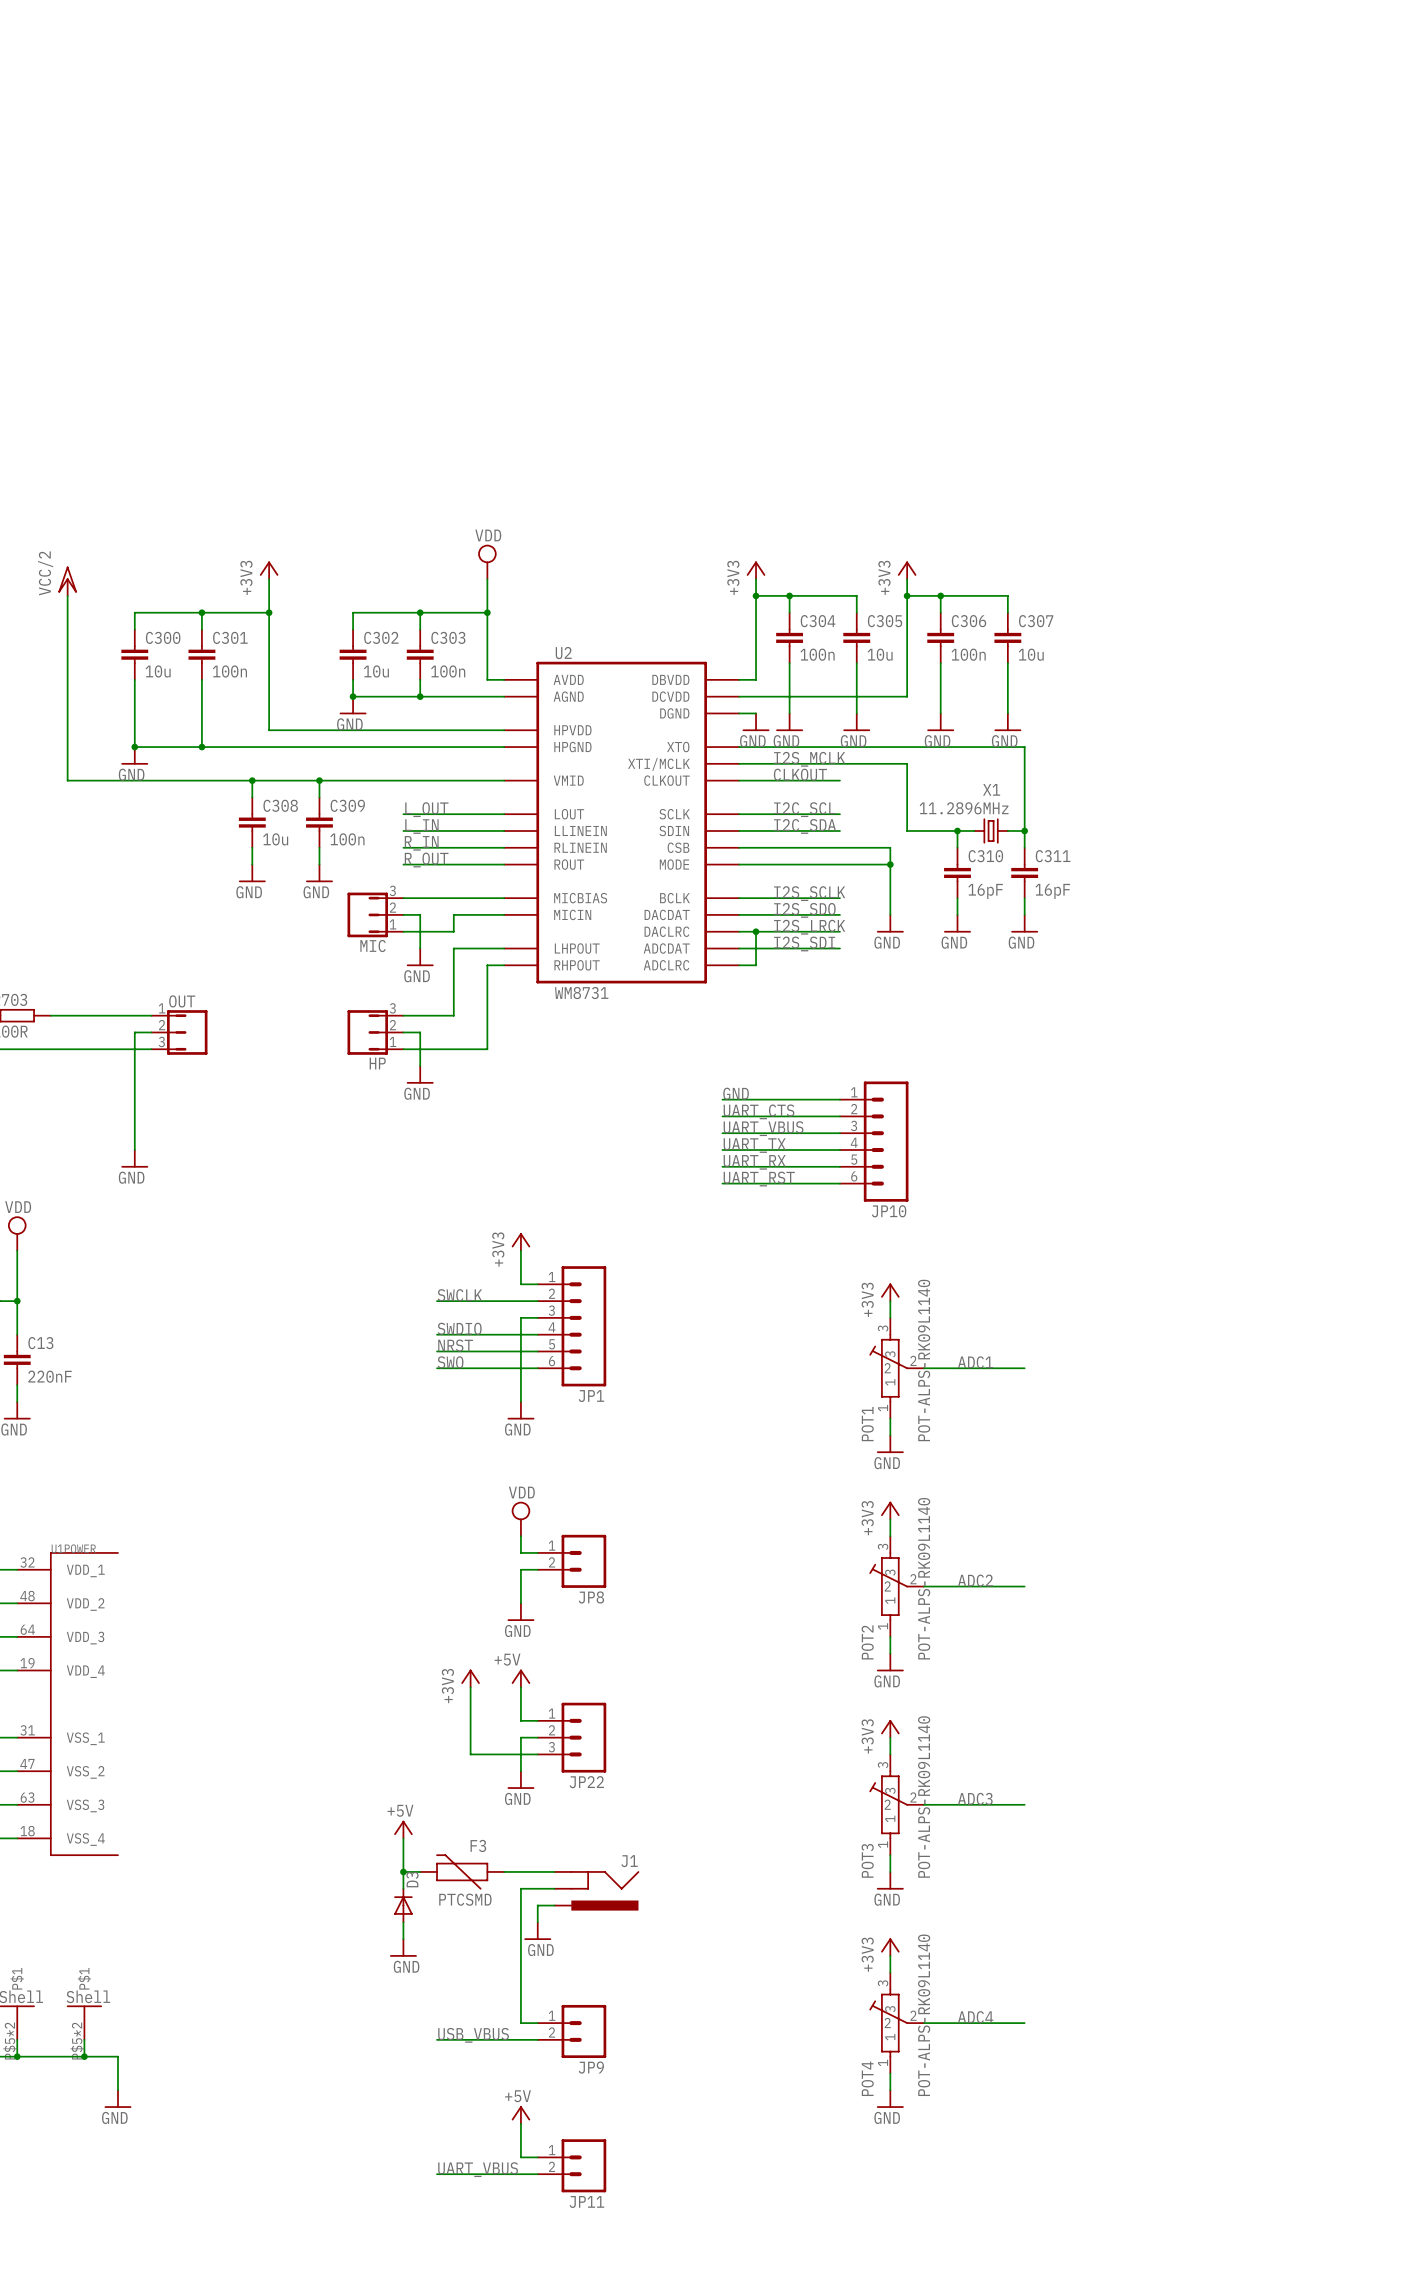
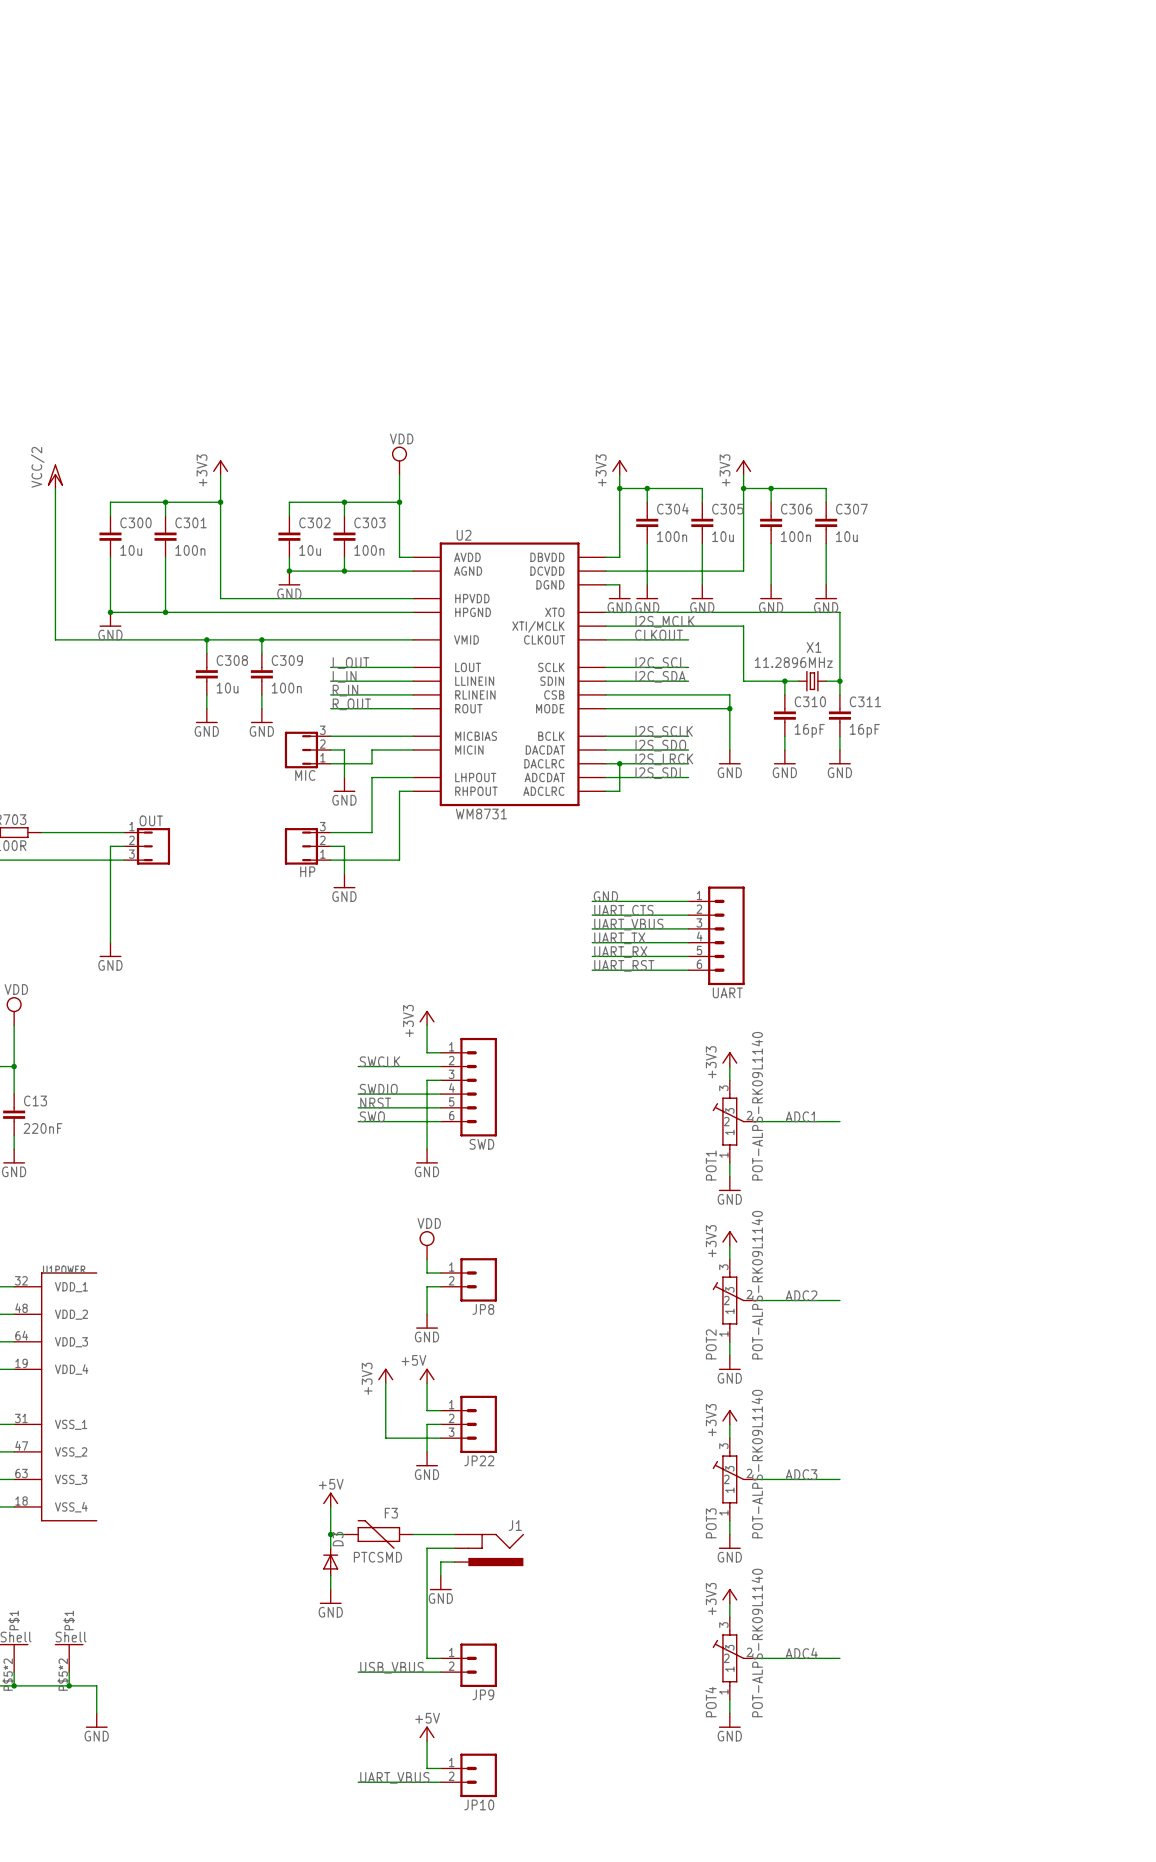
JP10 name: JP10 (889, 1211) -> UART (727, 992)
JP1 name: JP1 (591, 1396) -> SWD (481, 1144)
JP11 name: JP11 (586, 2202) -> JP10 (479, 1804)

